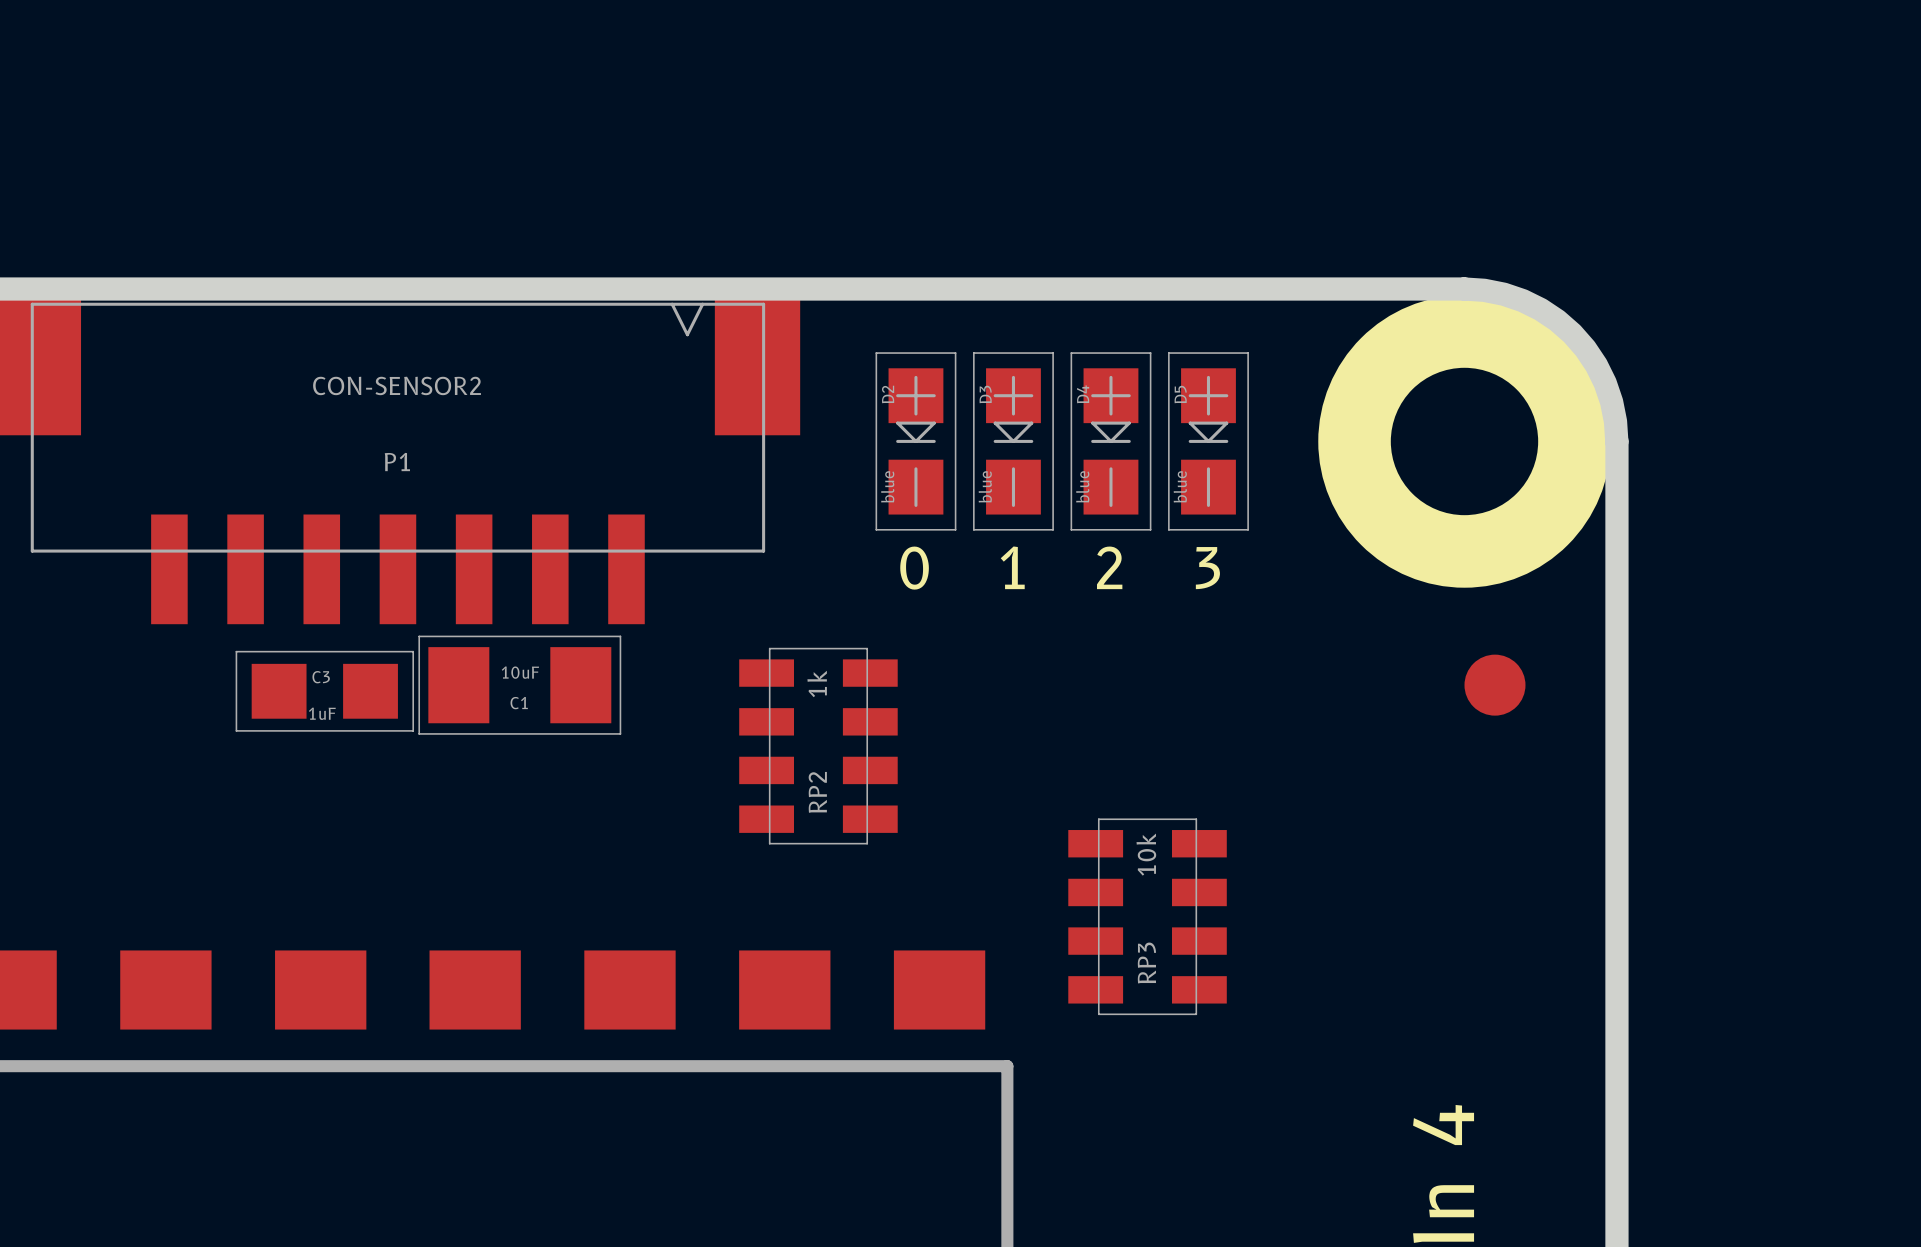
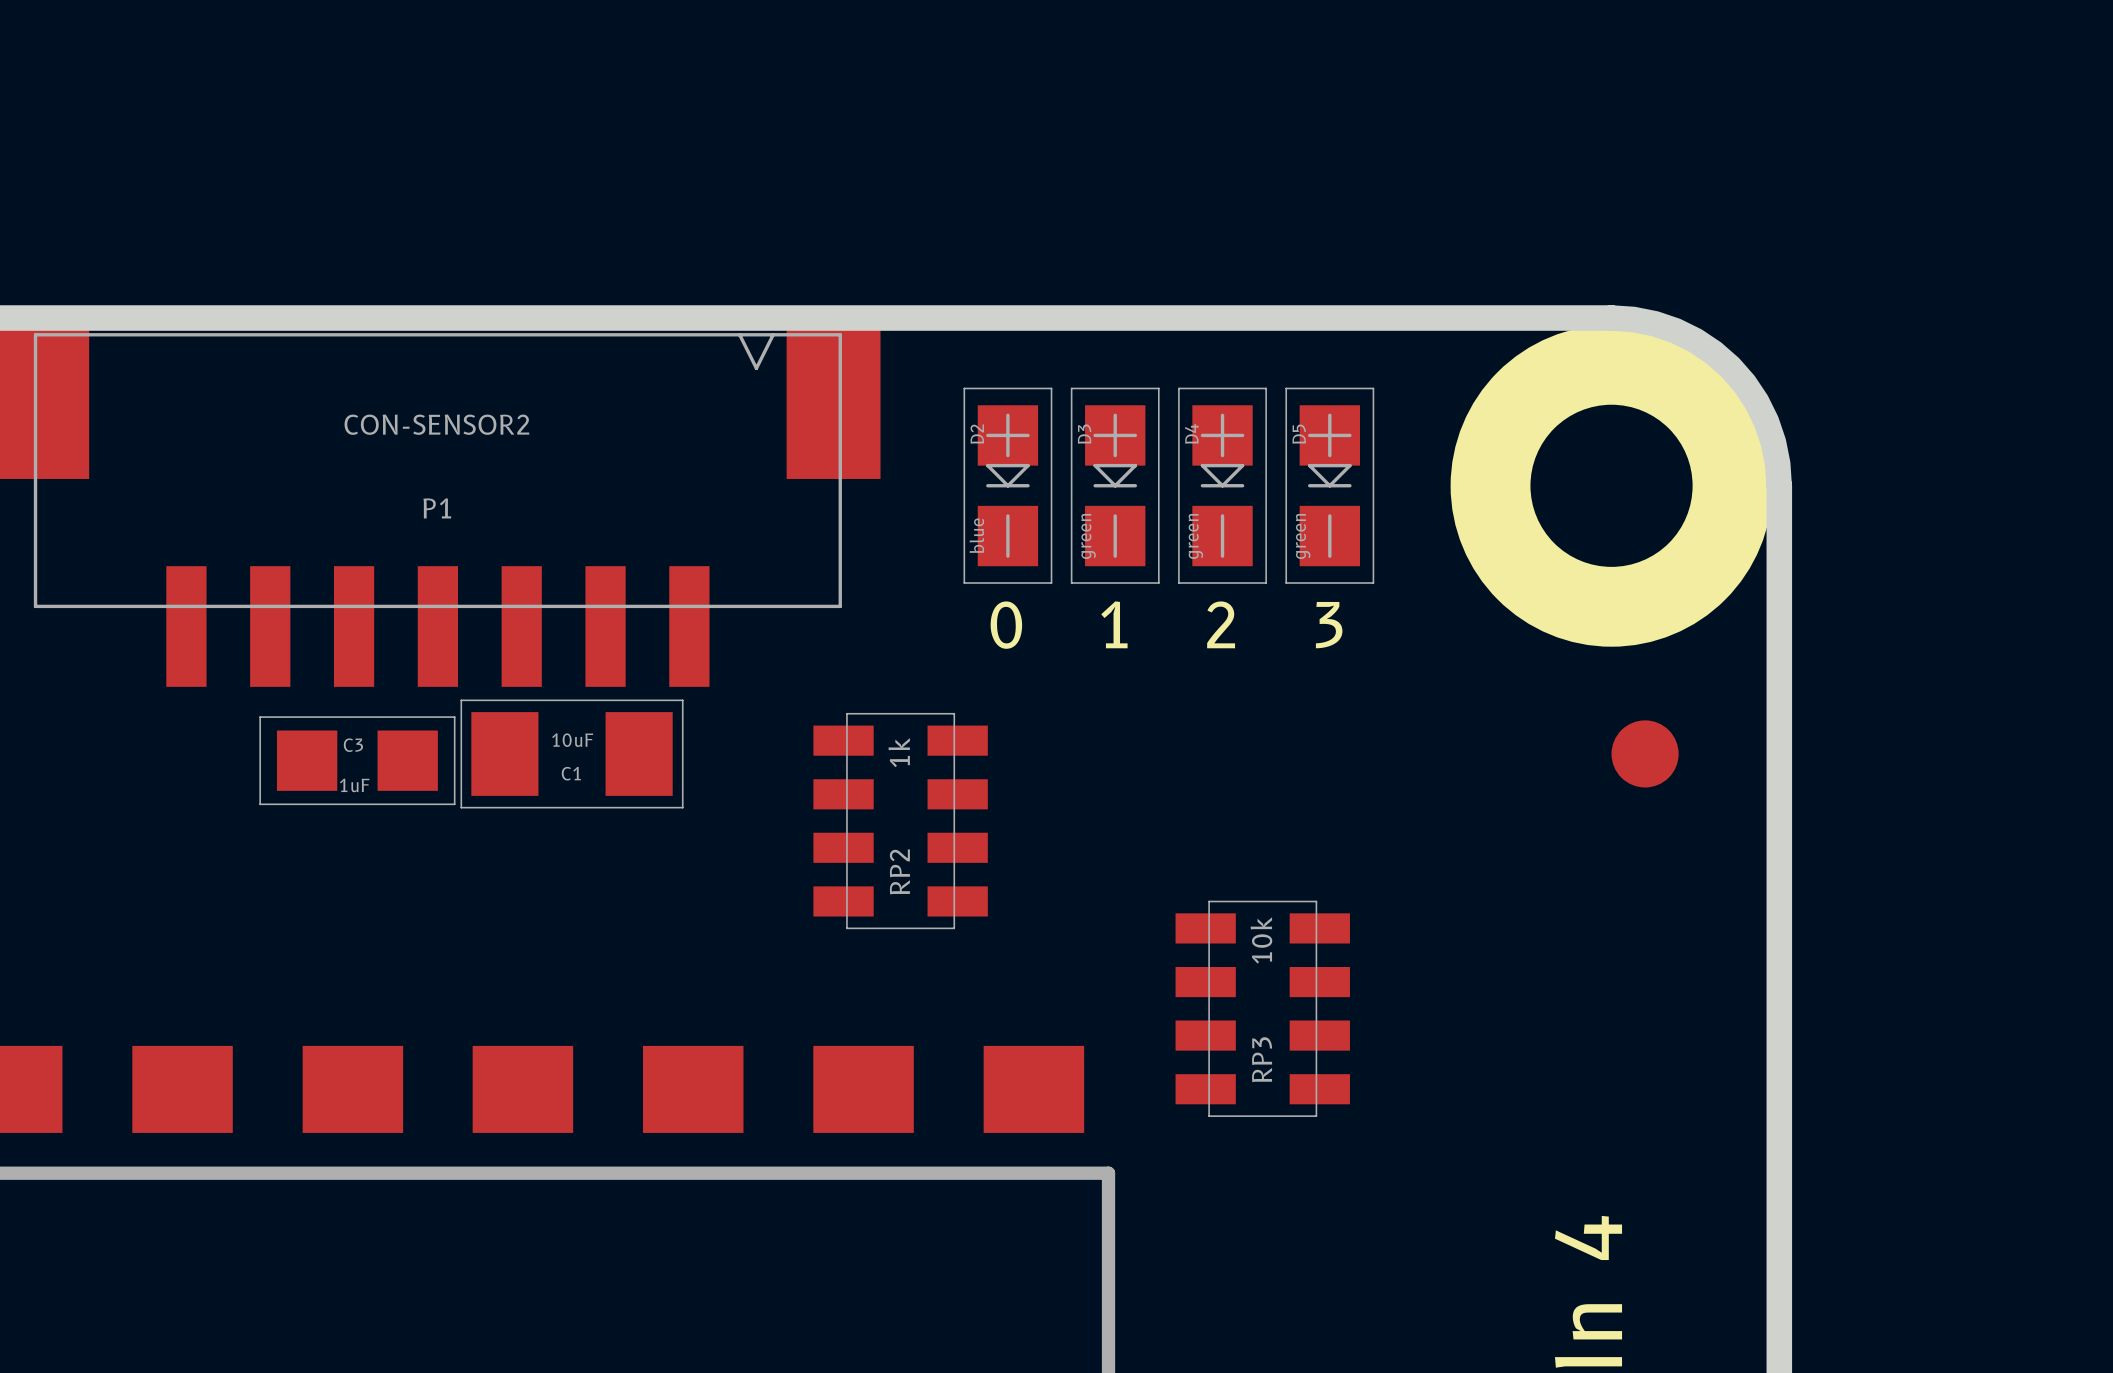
D3 value: blue (985, 486) -> green (1088, 536)
D4 value: blue (1082, 486) -> green (1195, 536)
D5 value: blue (1180, 486) -> green (1303, 536)

